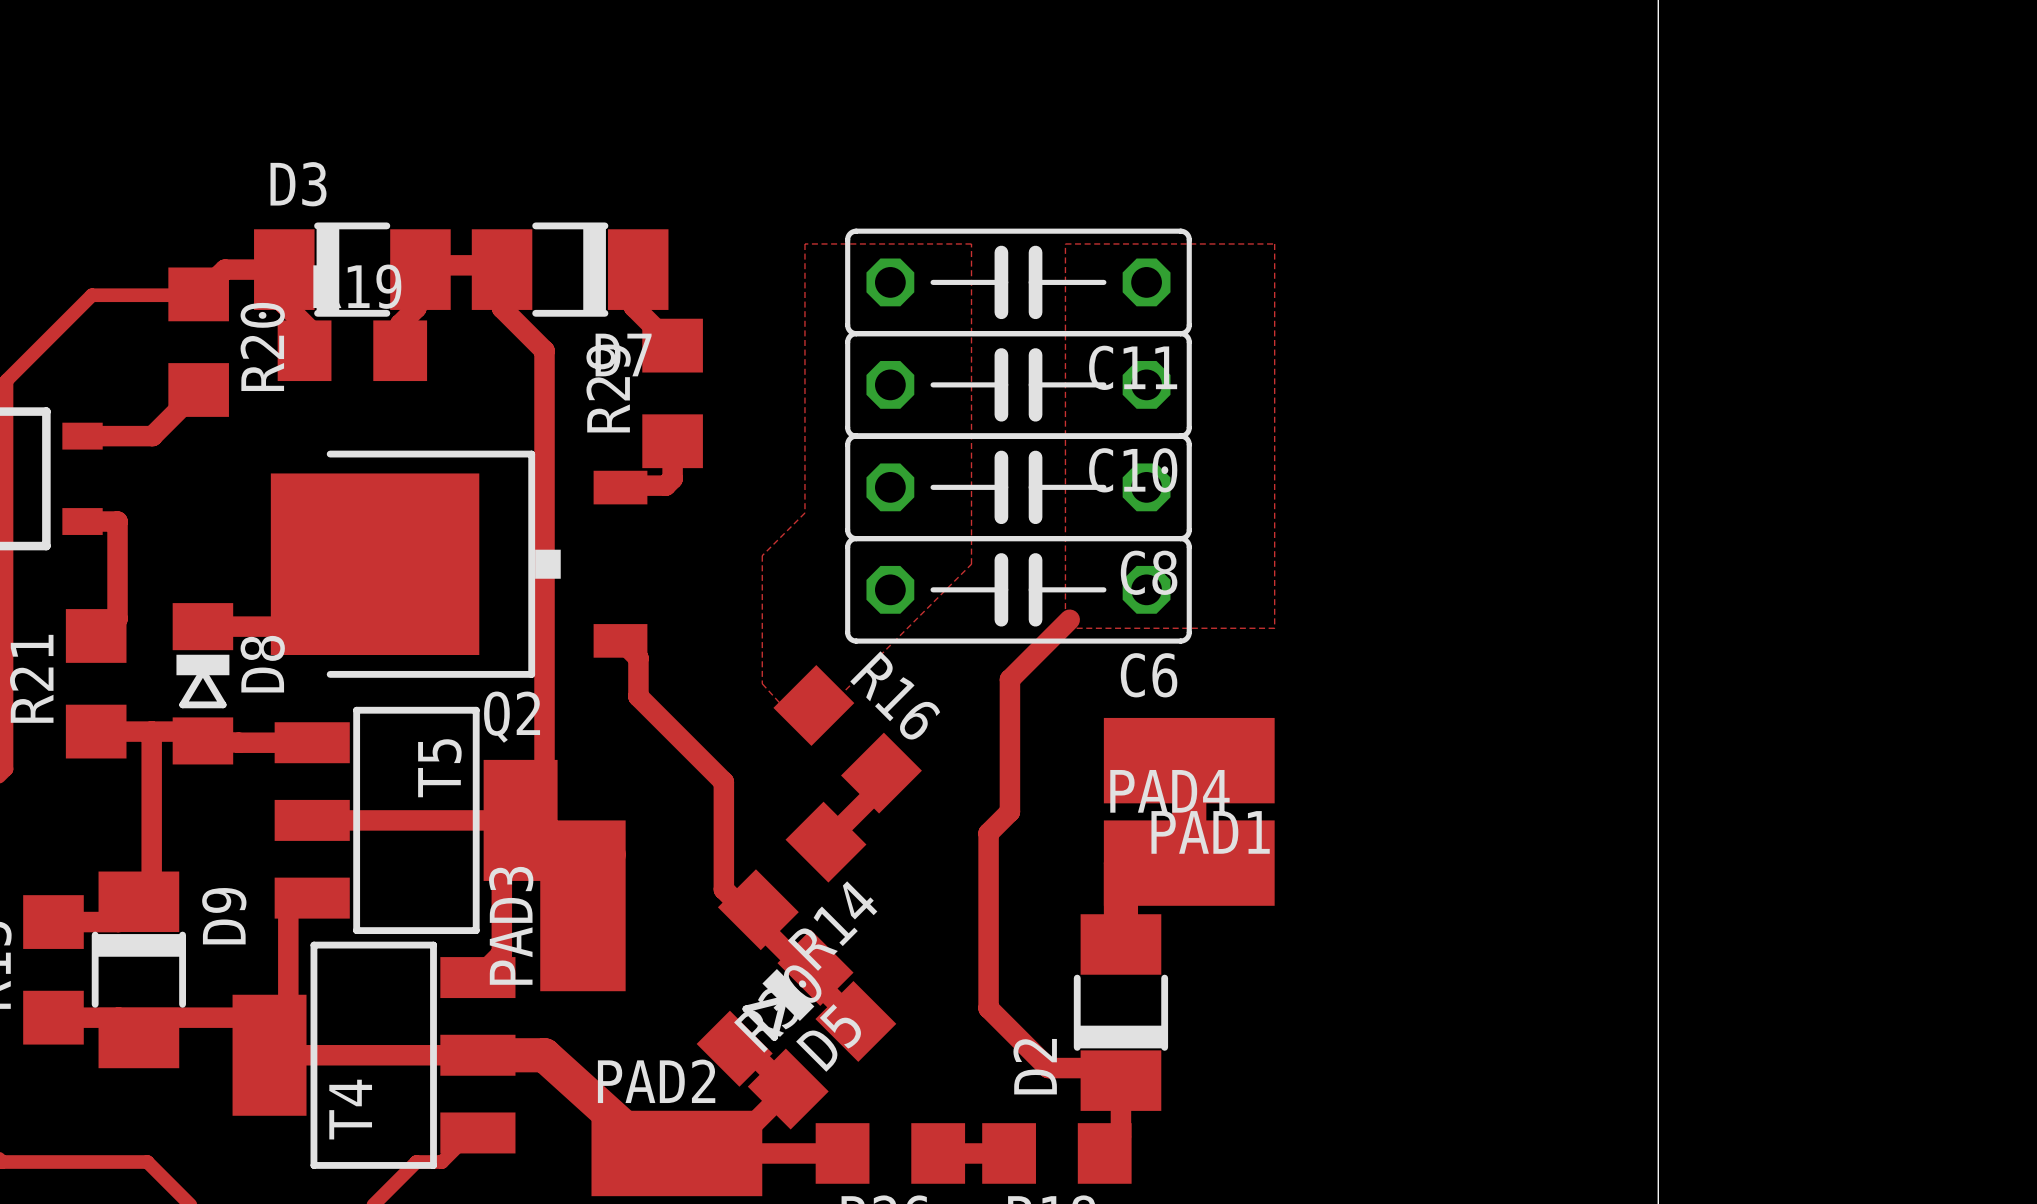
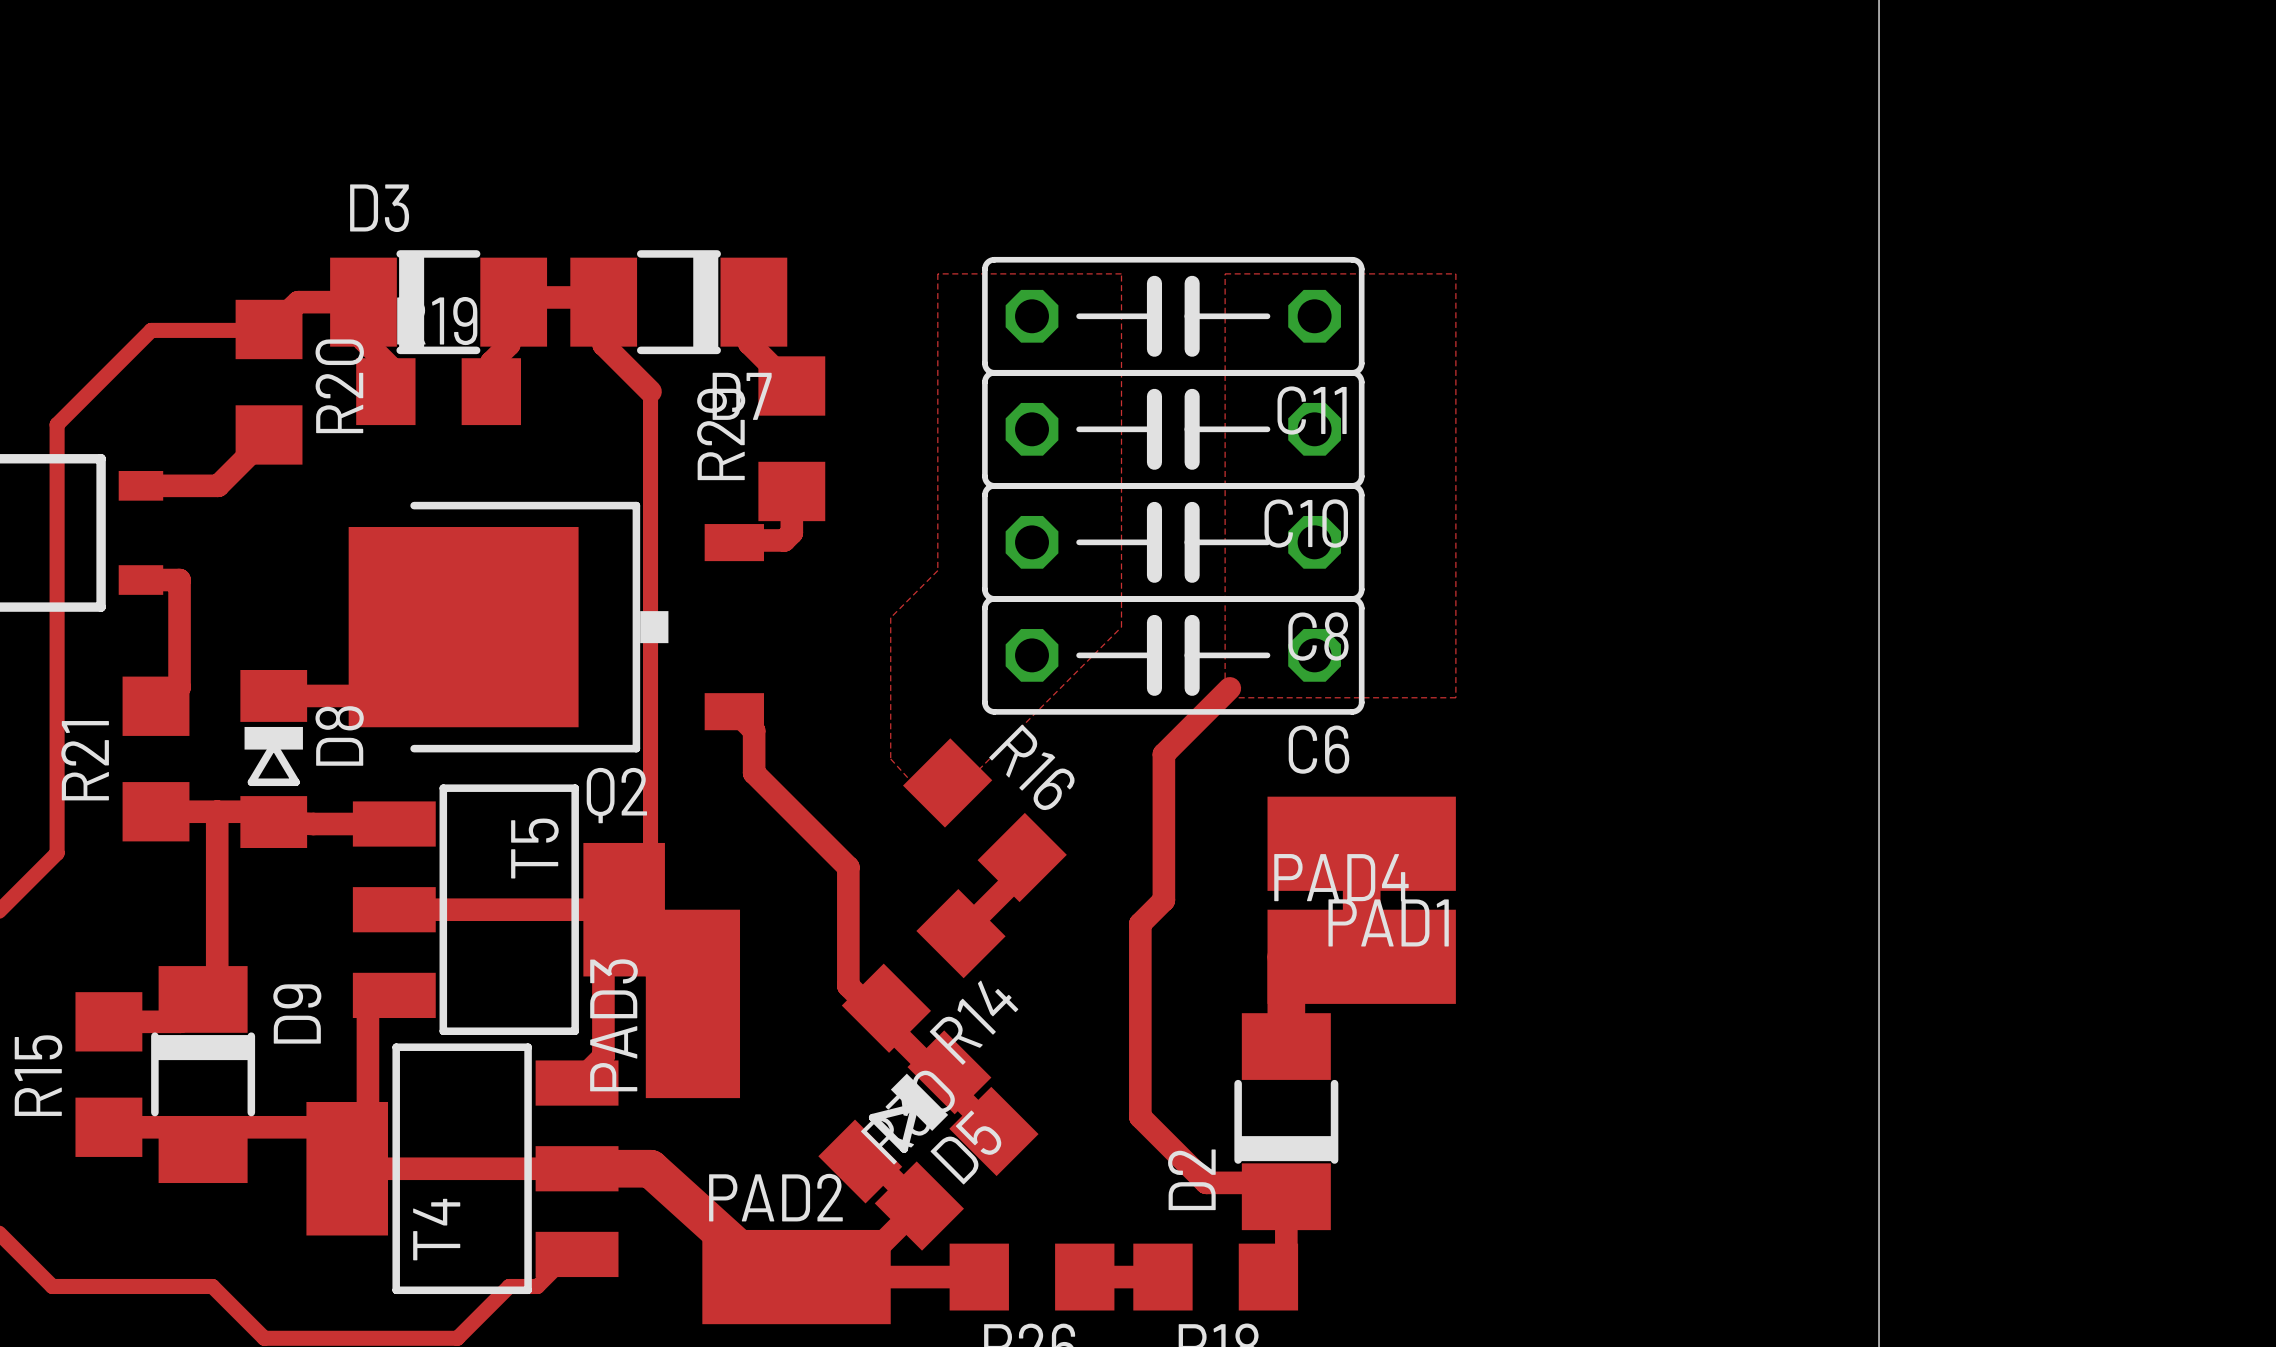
track width: thick (544, 350) (544, 777) -> thin (650, 391) (650, 862)

